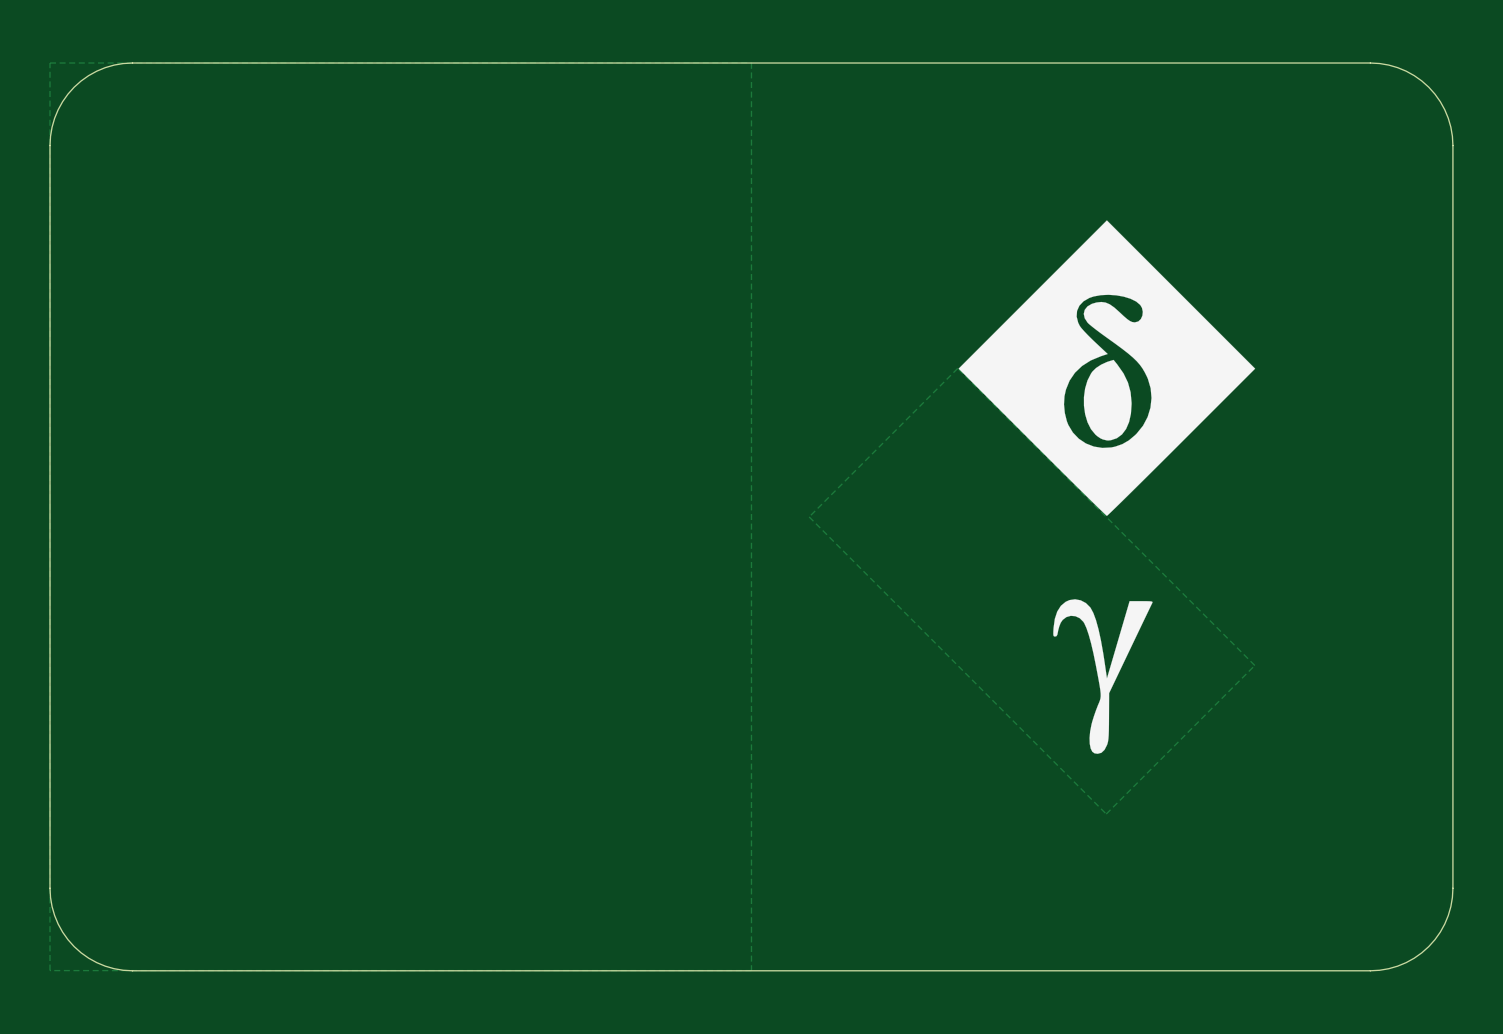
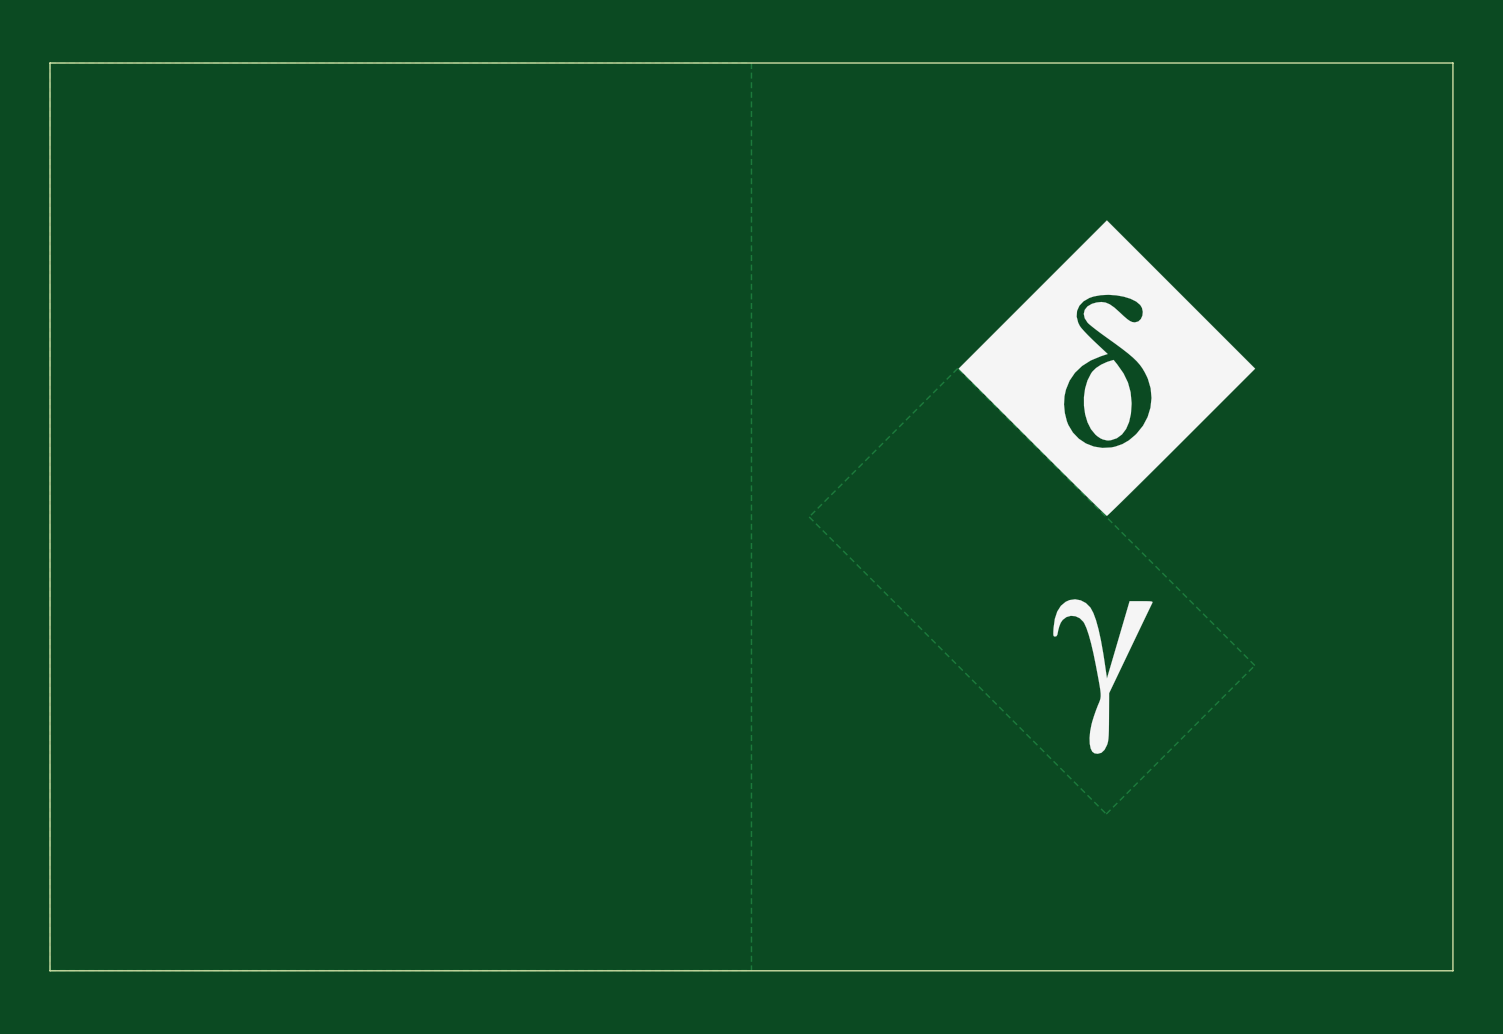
board edge: (132, 63) (114, 65) (96, 71) (74, 87) (58, 109) (52, 127) (50, 145) -> (132, 63) (50, 63) (50, 145)
board edge: (1370, 63) (1397, 67) (1414, 75) (1428, 87) (1440, 101) (1448, 118) (1452, 145) -> (1370, 63) (1452, 63) (1452, 145)
board edge: (50, 888) (52, 906) (58, 924) (74, 946) (88, 958) (105, 966) (132, 970) -> (50, 888) (50, 970) (132, 970)
board edge: (1452, 888) (1448, 915) (1440, 932) (1428, 946) (1414, 958) (1397, 966) (1370, 970) -> (1452, 888) (1452, 970) (1370, 970)

